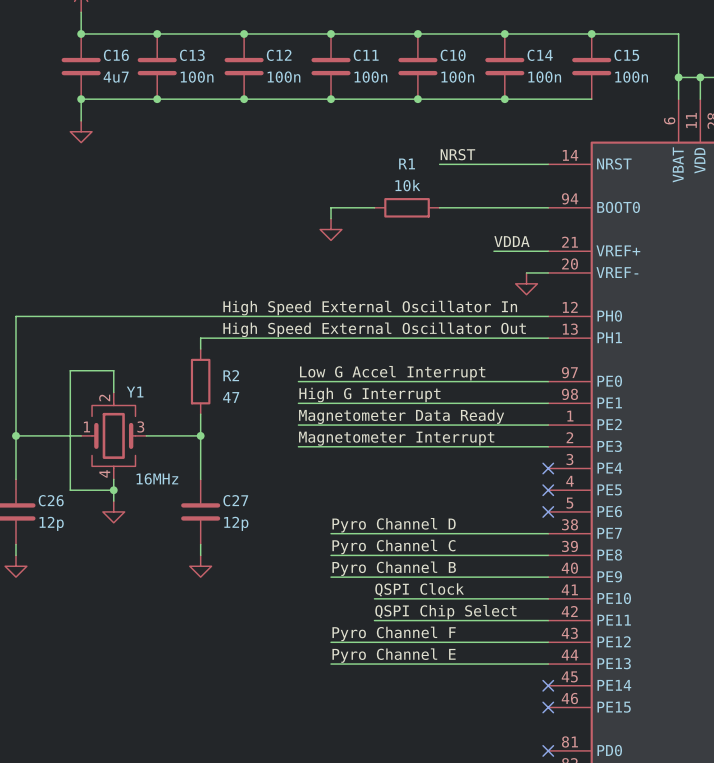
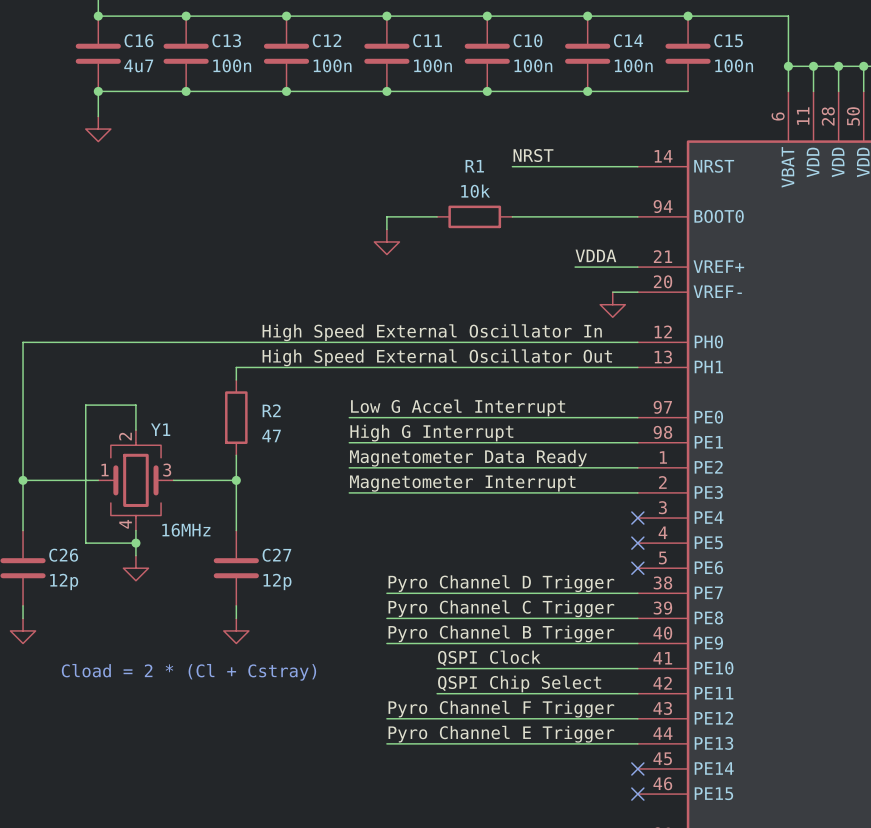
label: Pyro Channel D (394, 525) -> Pyro Channel D Trigger (501, 583)
label: Pyro Channel C (393, 546) -> Pyro Channel C Trigger (501, 608)
label: Pyro Channel B (394, 568) -> Pyro Channel B Trigger (501, 633)
text: none -> Cload = 2 * (Cl + Cstray) (188, 672)
label: Pyro Channel F (394, 633) -> Pyro Channel F Trigger (501, 709)
label: Pyro Channel E (394, 655) -> Pyro Channel E Trigger (501, 734)

